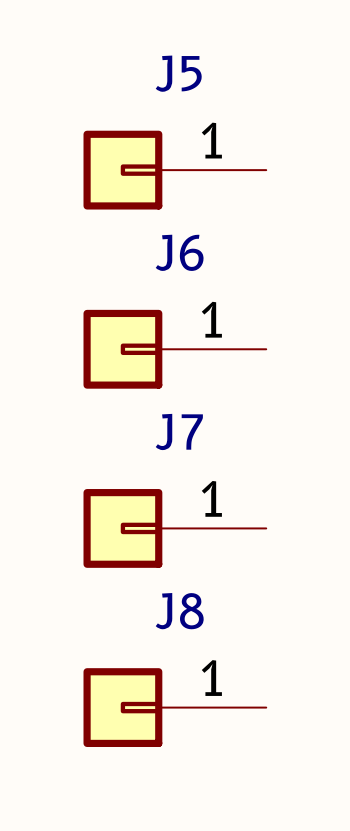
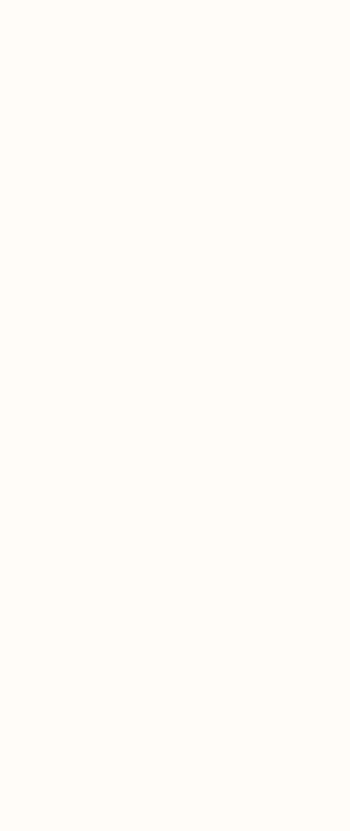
J5: (174, 170) -> none
J6: (174, 349) -> none
J7: (174, 528) -> none
J8: (174, 707) -> none

